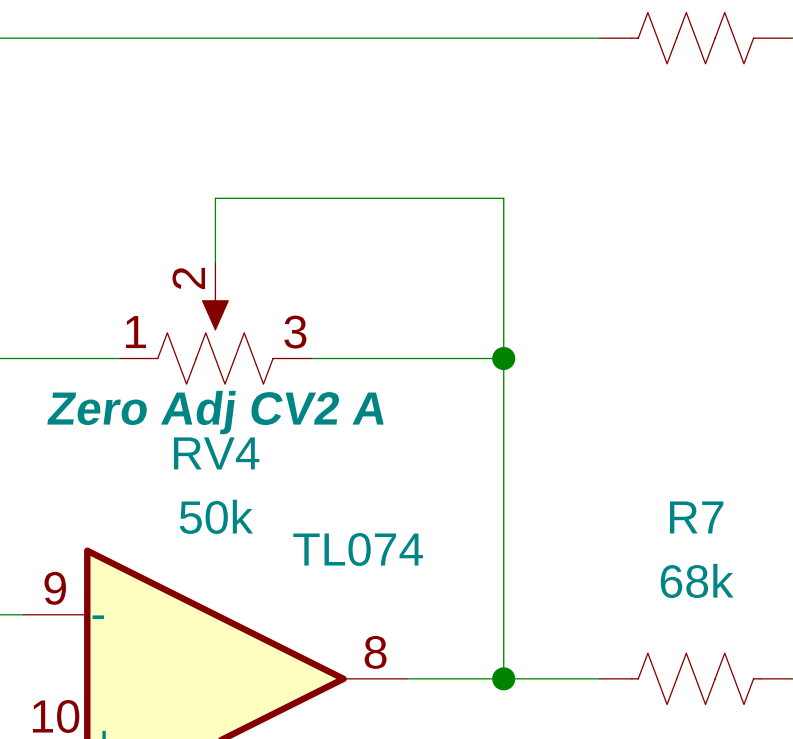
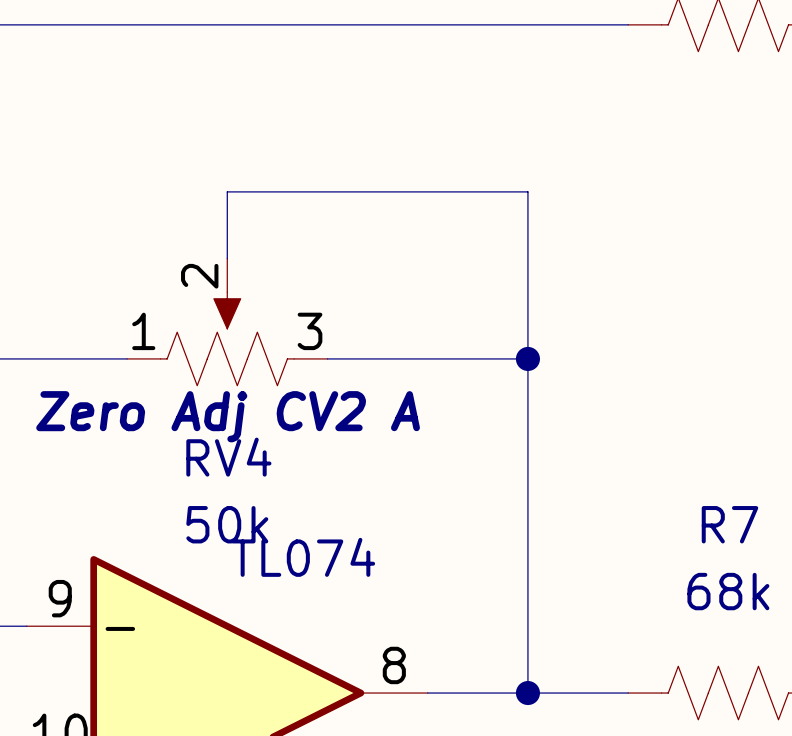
part value position: TL074 (358, 549) -> TL074 (303, 557)

